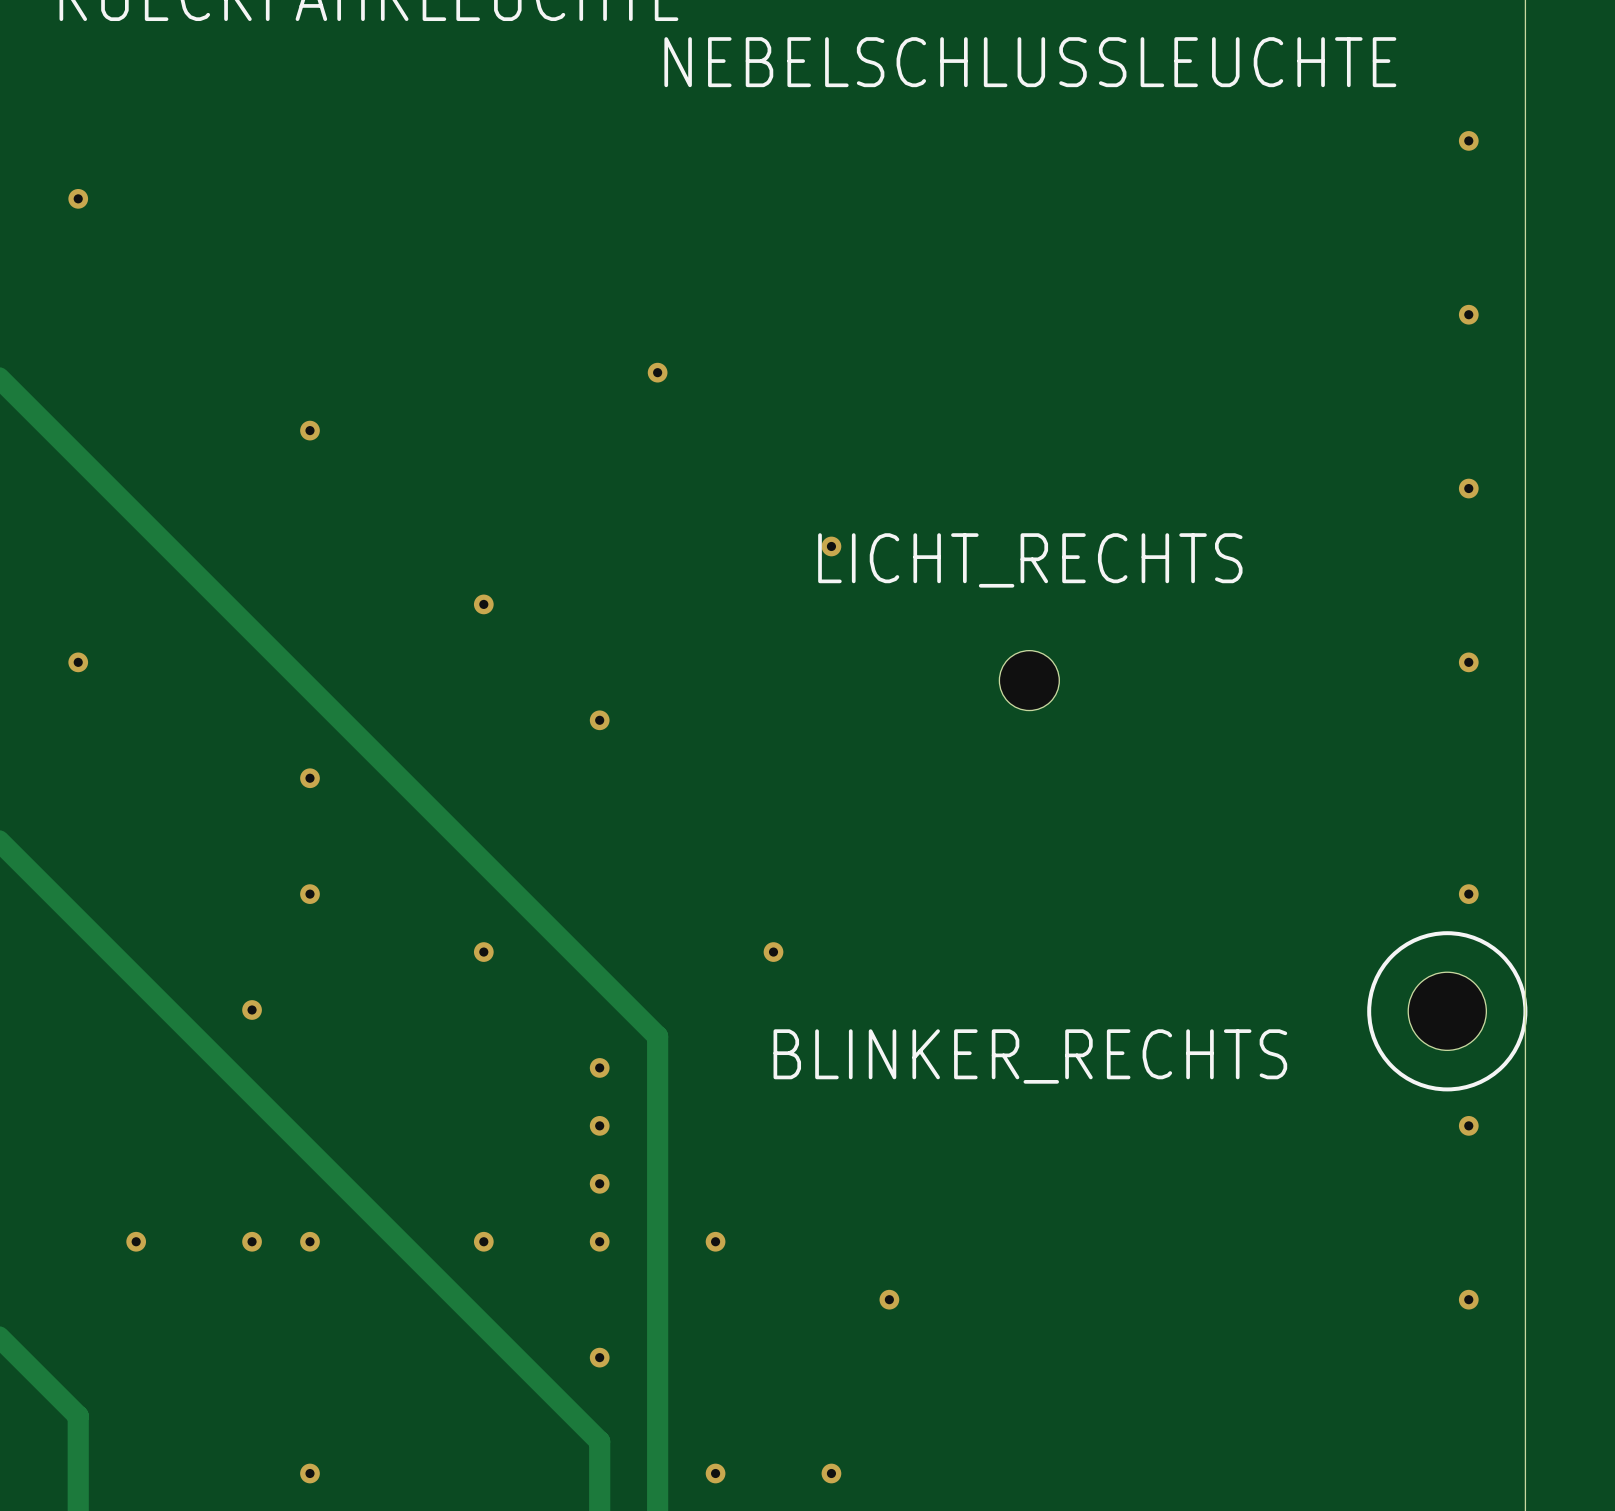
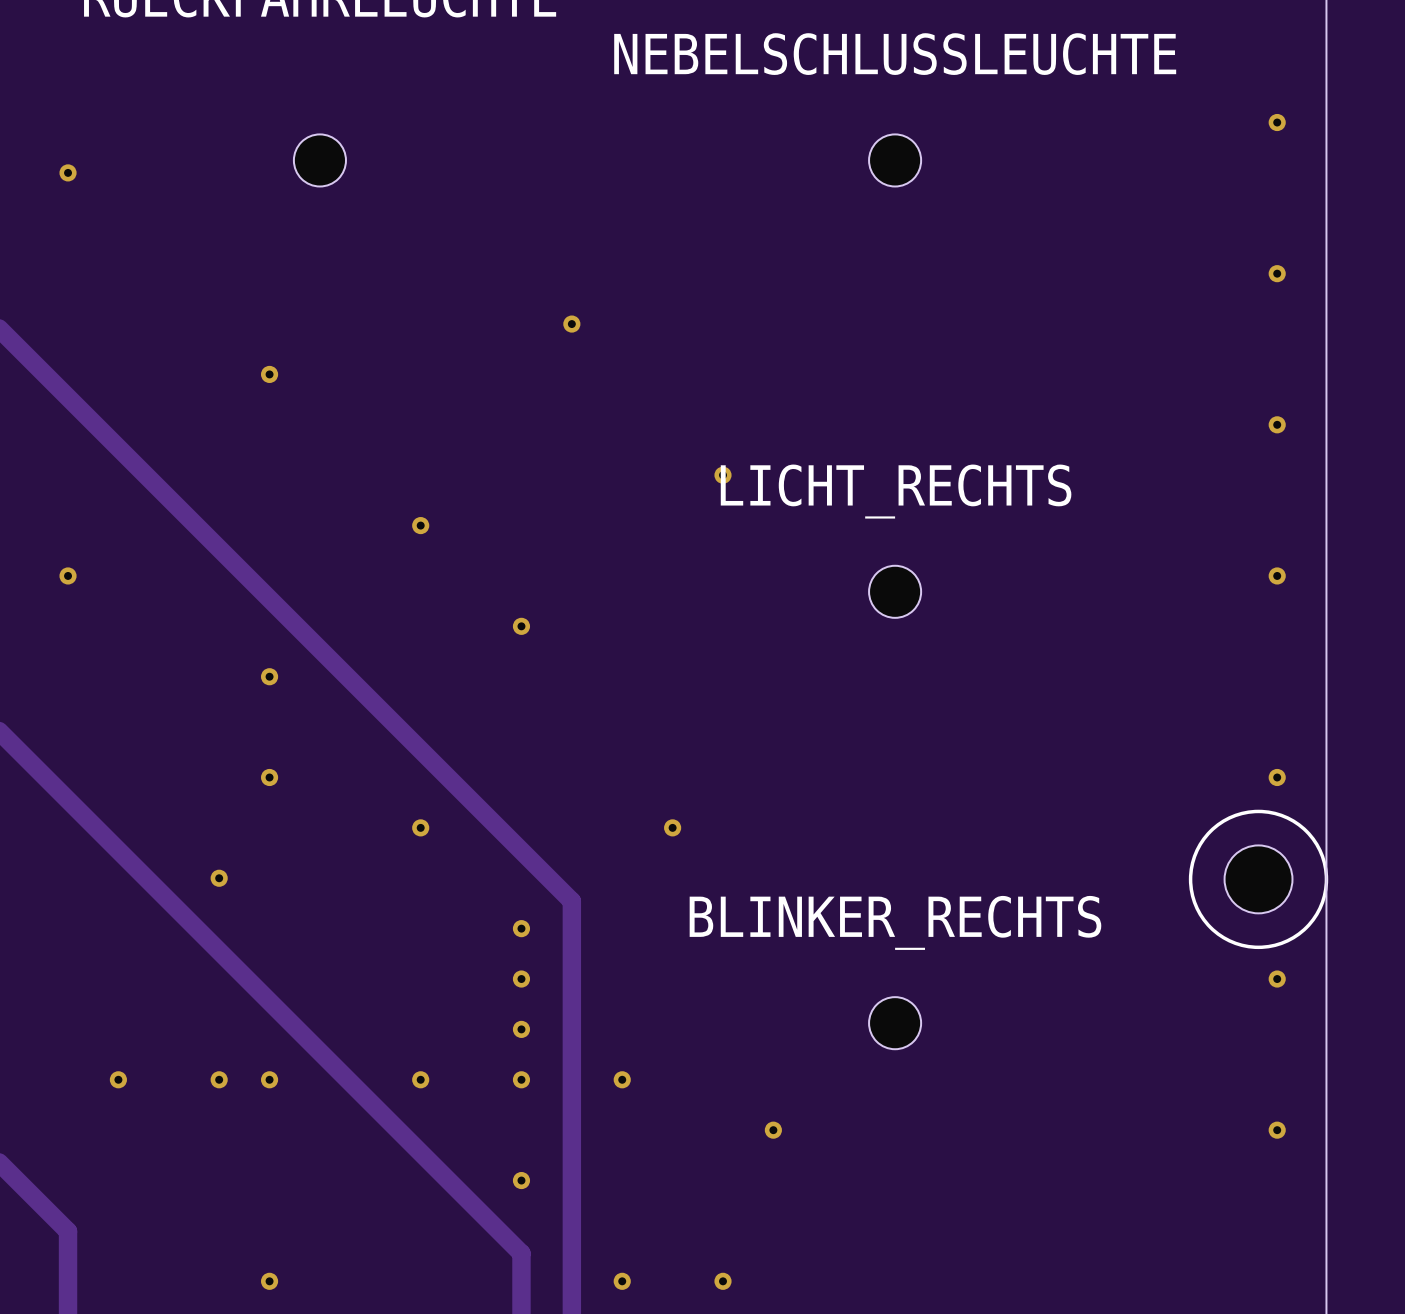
part: none -> (319, 160)
part: none -> (895, 160)
part: none -> (895, 1023)

